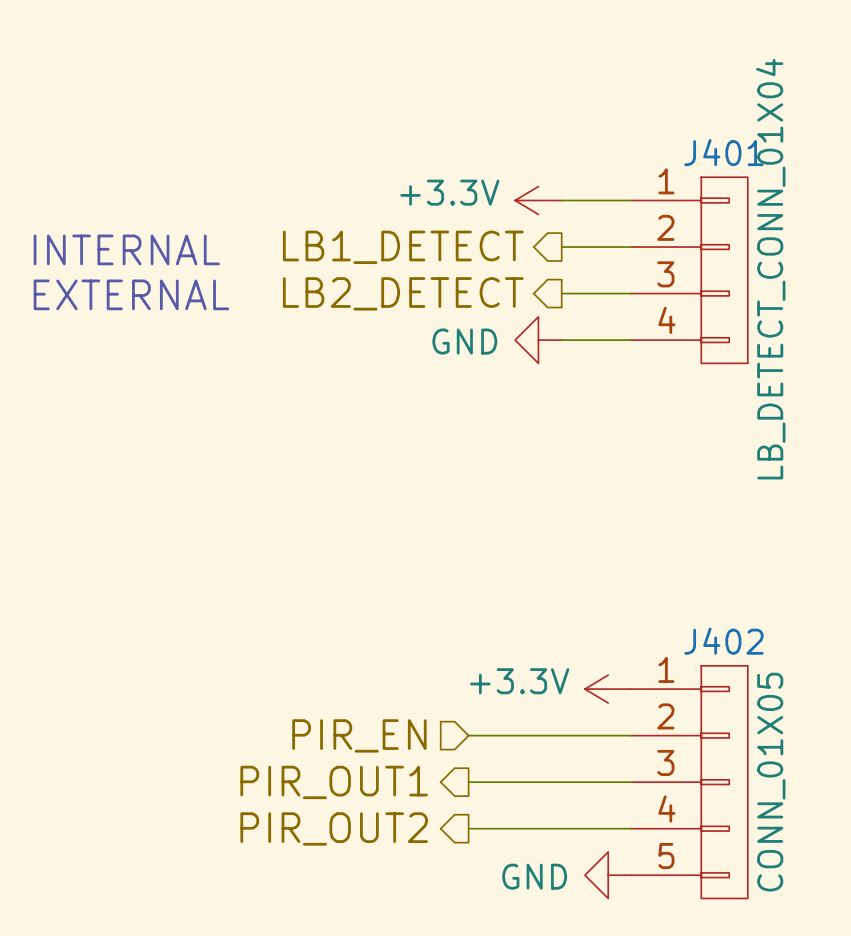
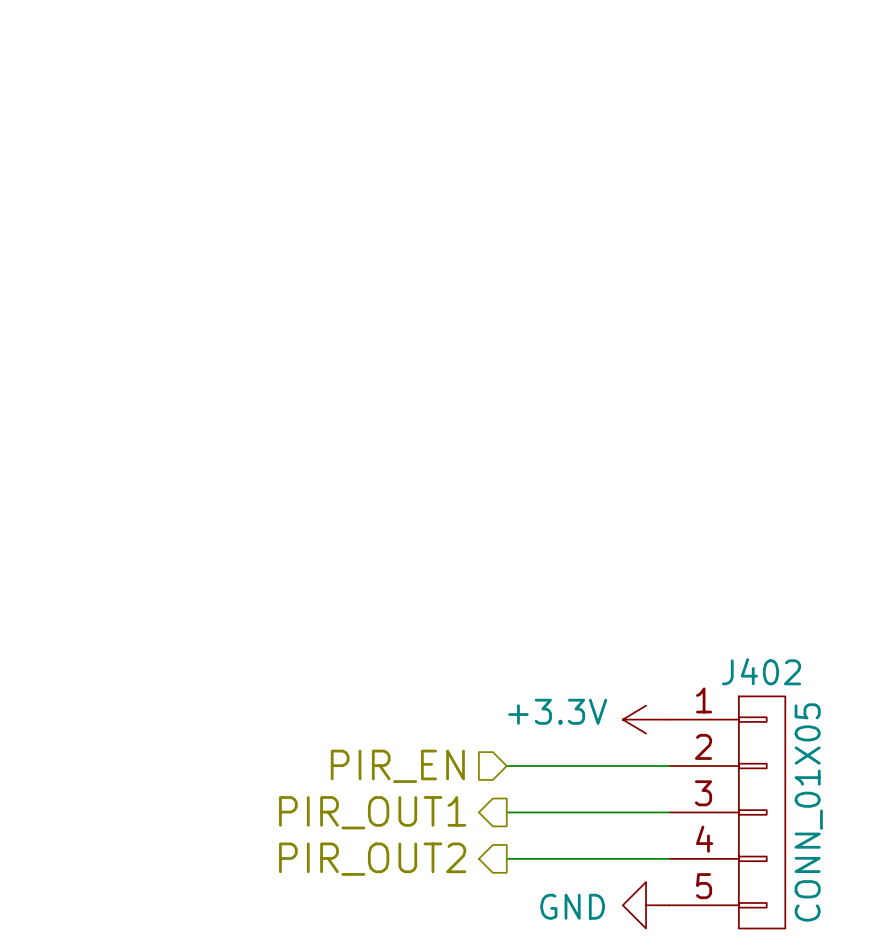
power symbol: +3.3V (538, 200) -> none
wire: (561, 200) (631, 200) -> none
hierarchical label: LB1_DETECT (403, 247) -> none
wire: (561, 247) (631, 247) -> none
text: INTERNAL (126, 249) -> none
J401: LB_DETECT_CONN_01X04 (689, 270) -> none
hierarchical label: LB2_DETECT (403, 293) -> none
wire: (561, 293) (631, 293) -> none
text: EXTERNAL (131, 294) -> none
power symbol: GND (538, 340) -> none
wire: (561, 340) (631, 340) -> none

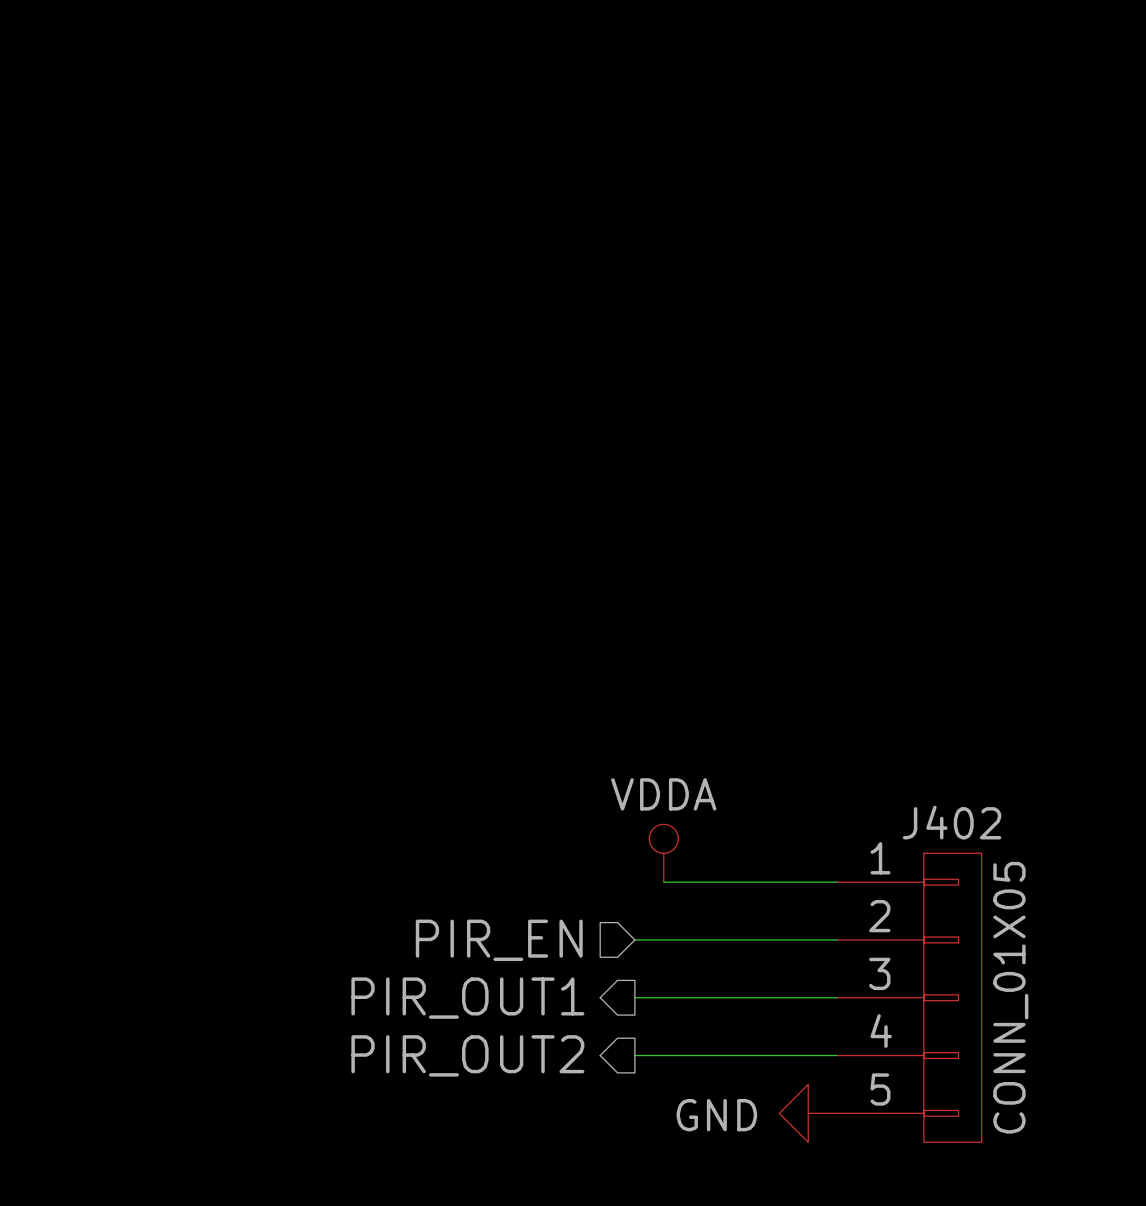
power symbol: none -> VDDA (663, 853)
wire: none -> (663, 882) (837, 882)
power symbol: +3.3V (646, 719) -> none

